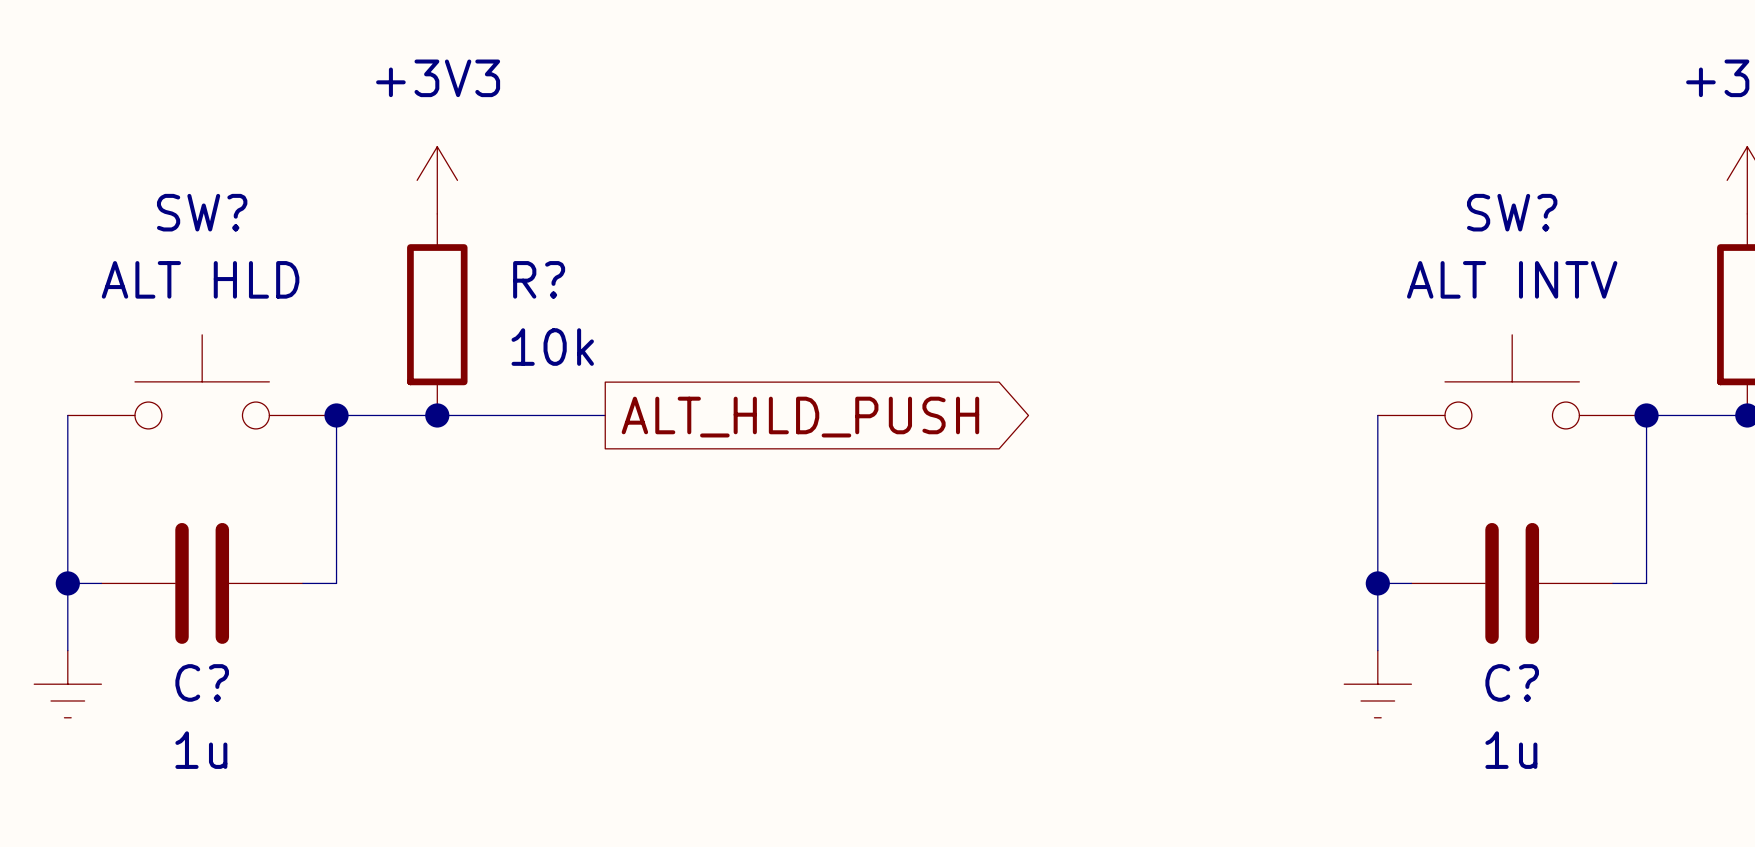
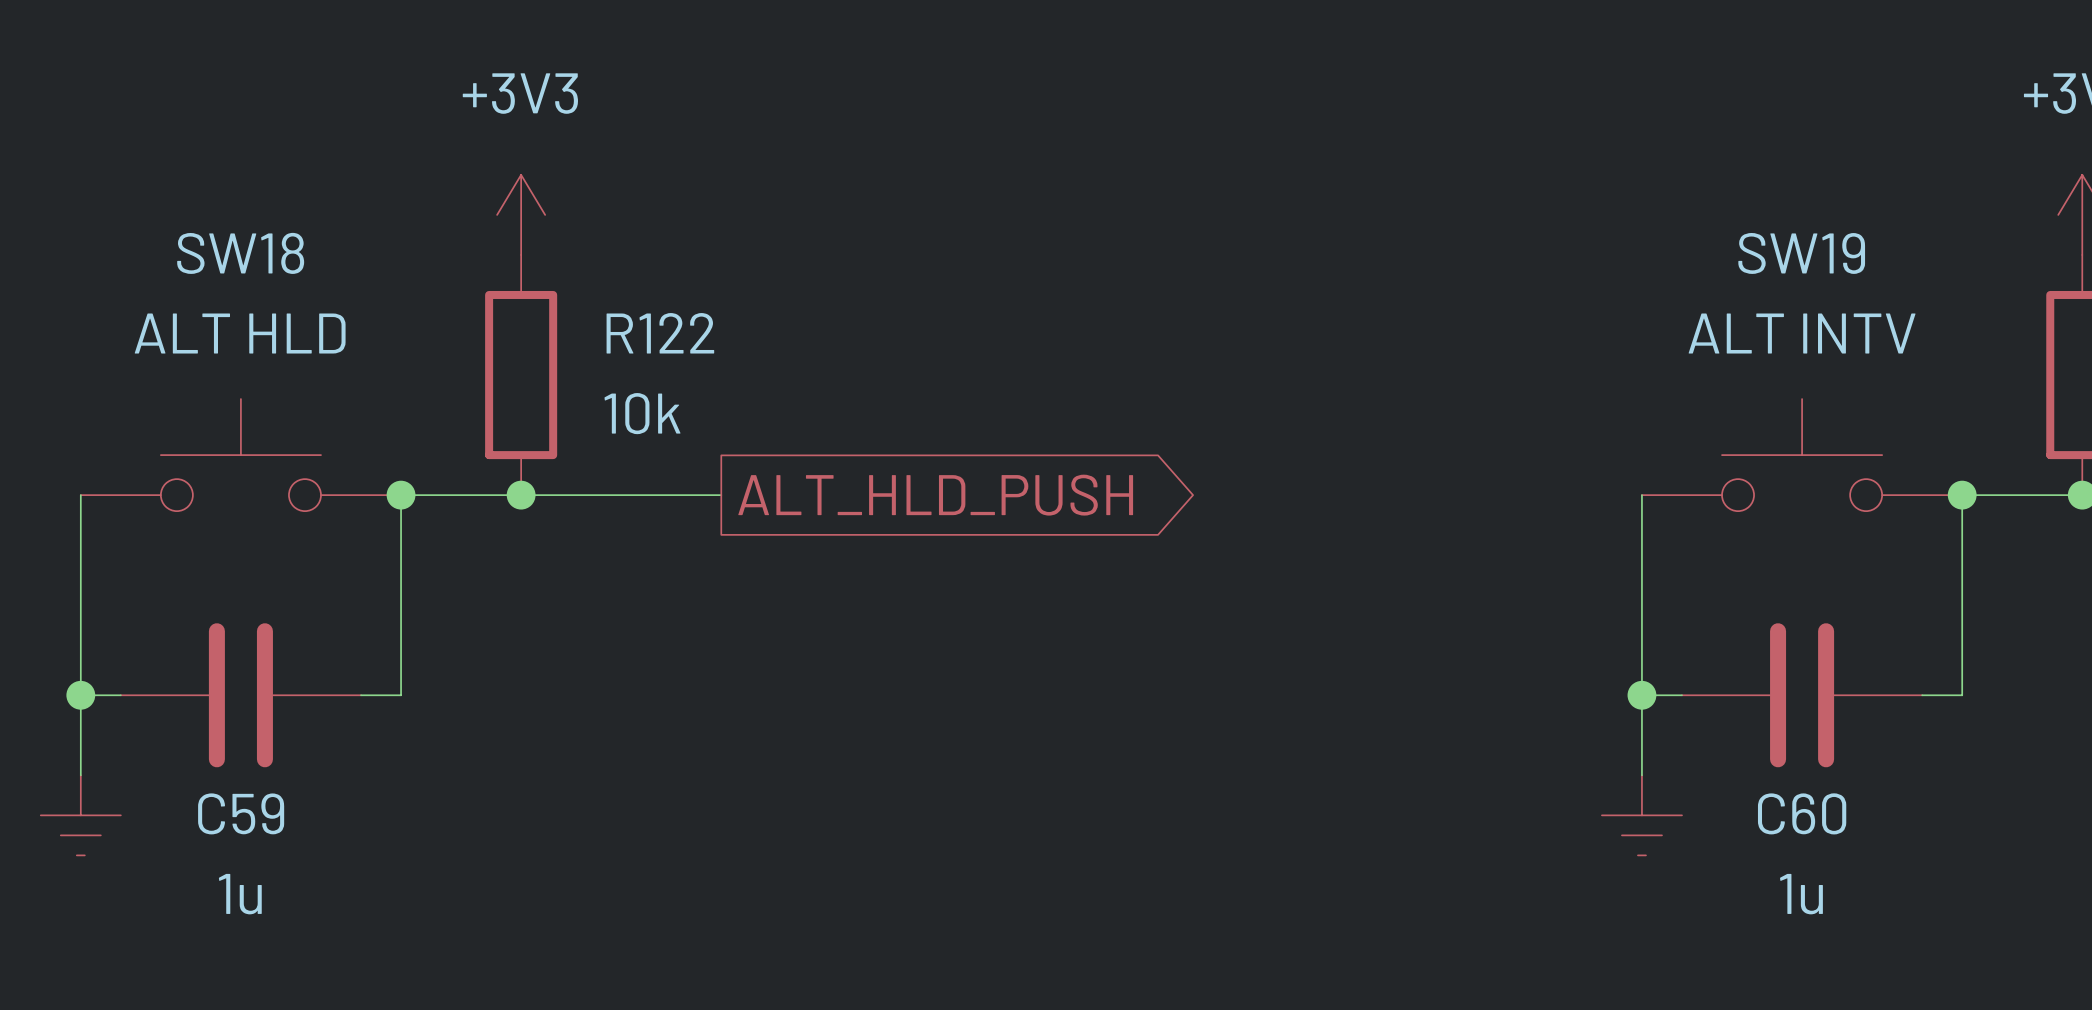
SW? name: SW? (202, 212) -> SW18 (240, 253)
SW? name: SW? (1512, 212) -> SW19 (1801, 253)
R? name: R? (539, 279) -> R122 (660, 333)
C? name: C? (202, 682) -> C59 (241, 813)
C? name: C? (1512, 682) -> C60 (1802, 813)

